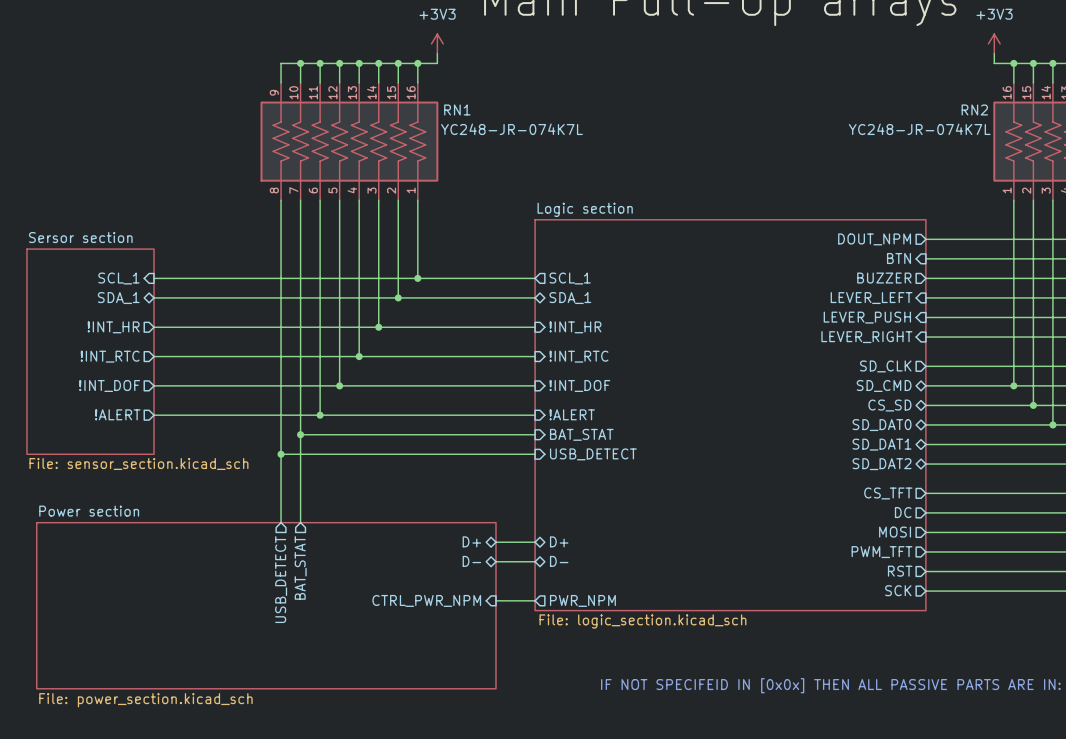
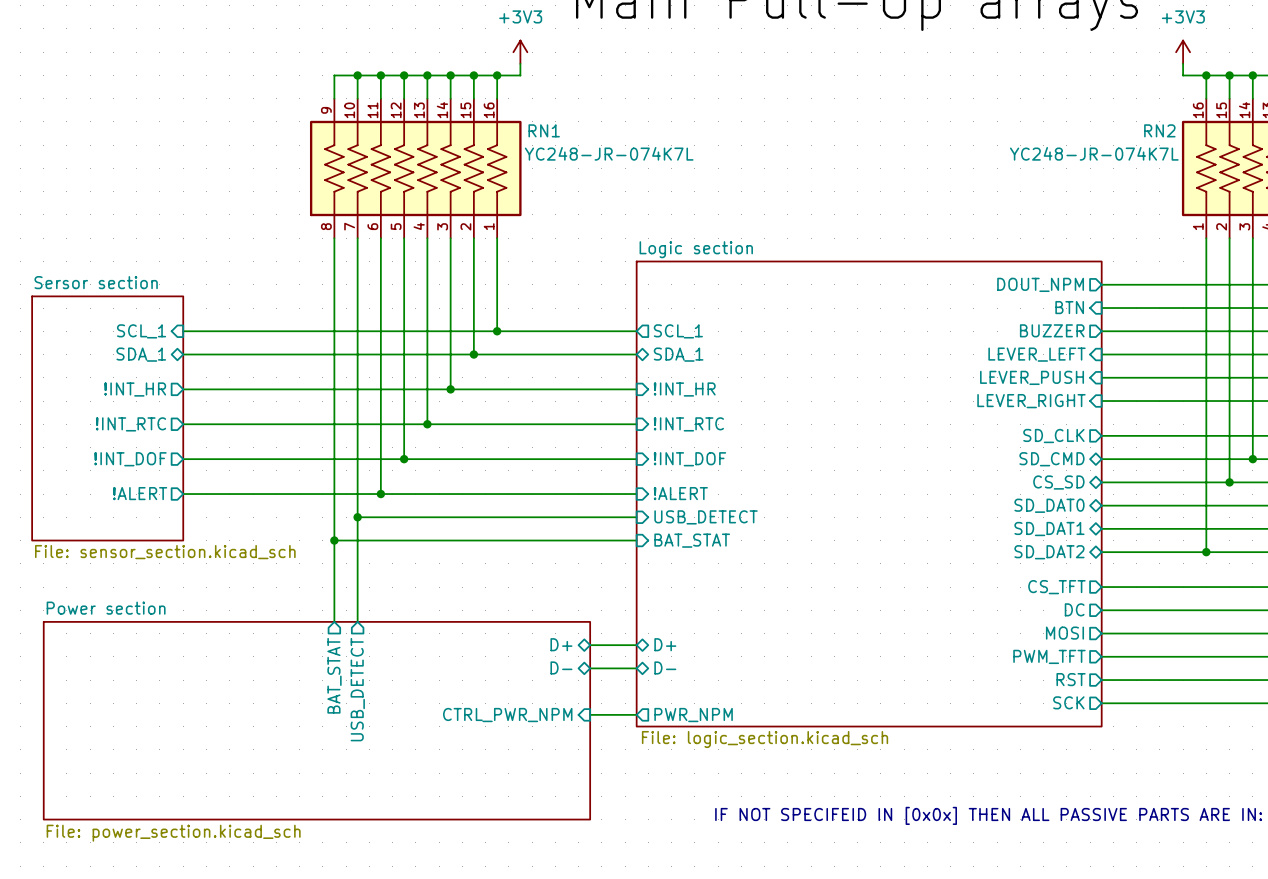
wire: none -> (1206, 459) (1206, 552)
junction: (1013, 385) -> none
wire: (1052, 385) (1052, 424) -> none
junction: none -> (1252, 459)
junction: (1052, 424) -> none
sheet pin: BAT_STAT (581, 434) -> USB_DETECT (706, 517)
sheet pin: USB_DETECT (593, 454) -> BAT_STAT (692, 540)
junction: none -> (1206, 552)
sheet pin: BAT_STAT (300, 567) -> USB_DETECT (357, 689)
sheet pin: USB_DETECT (281, 579) -> BAT_STAT (334, 675)

